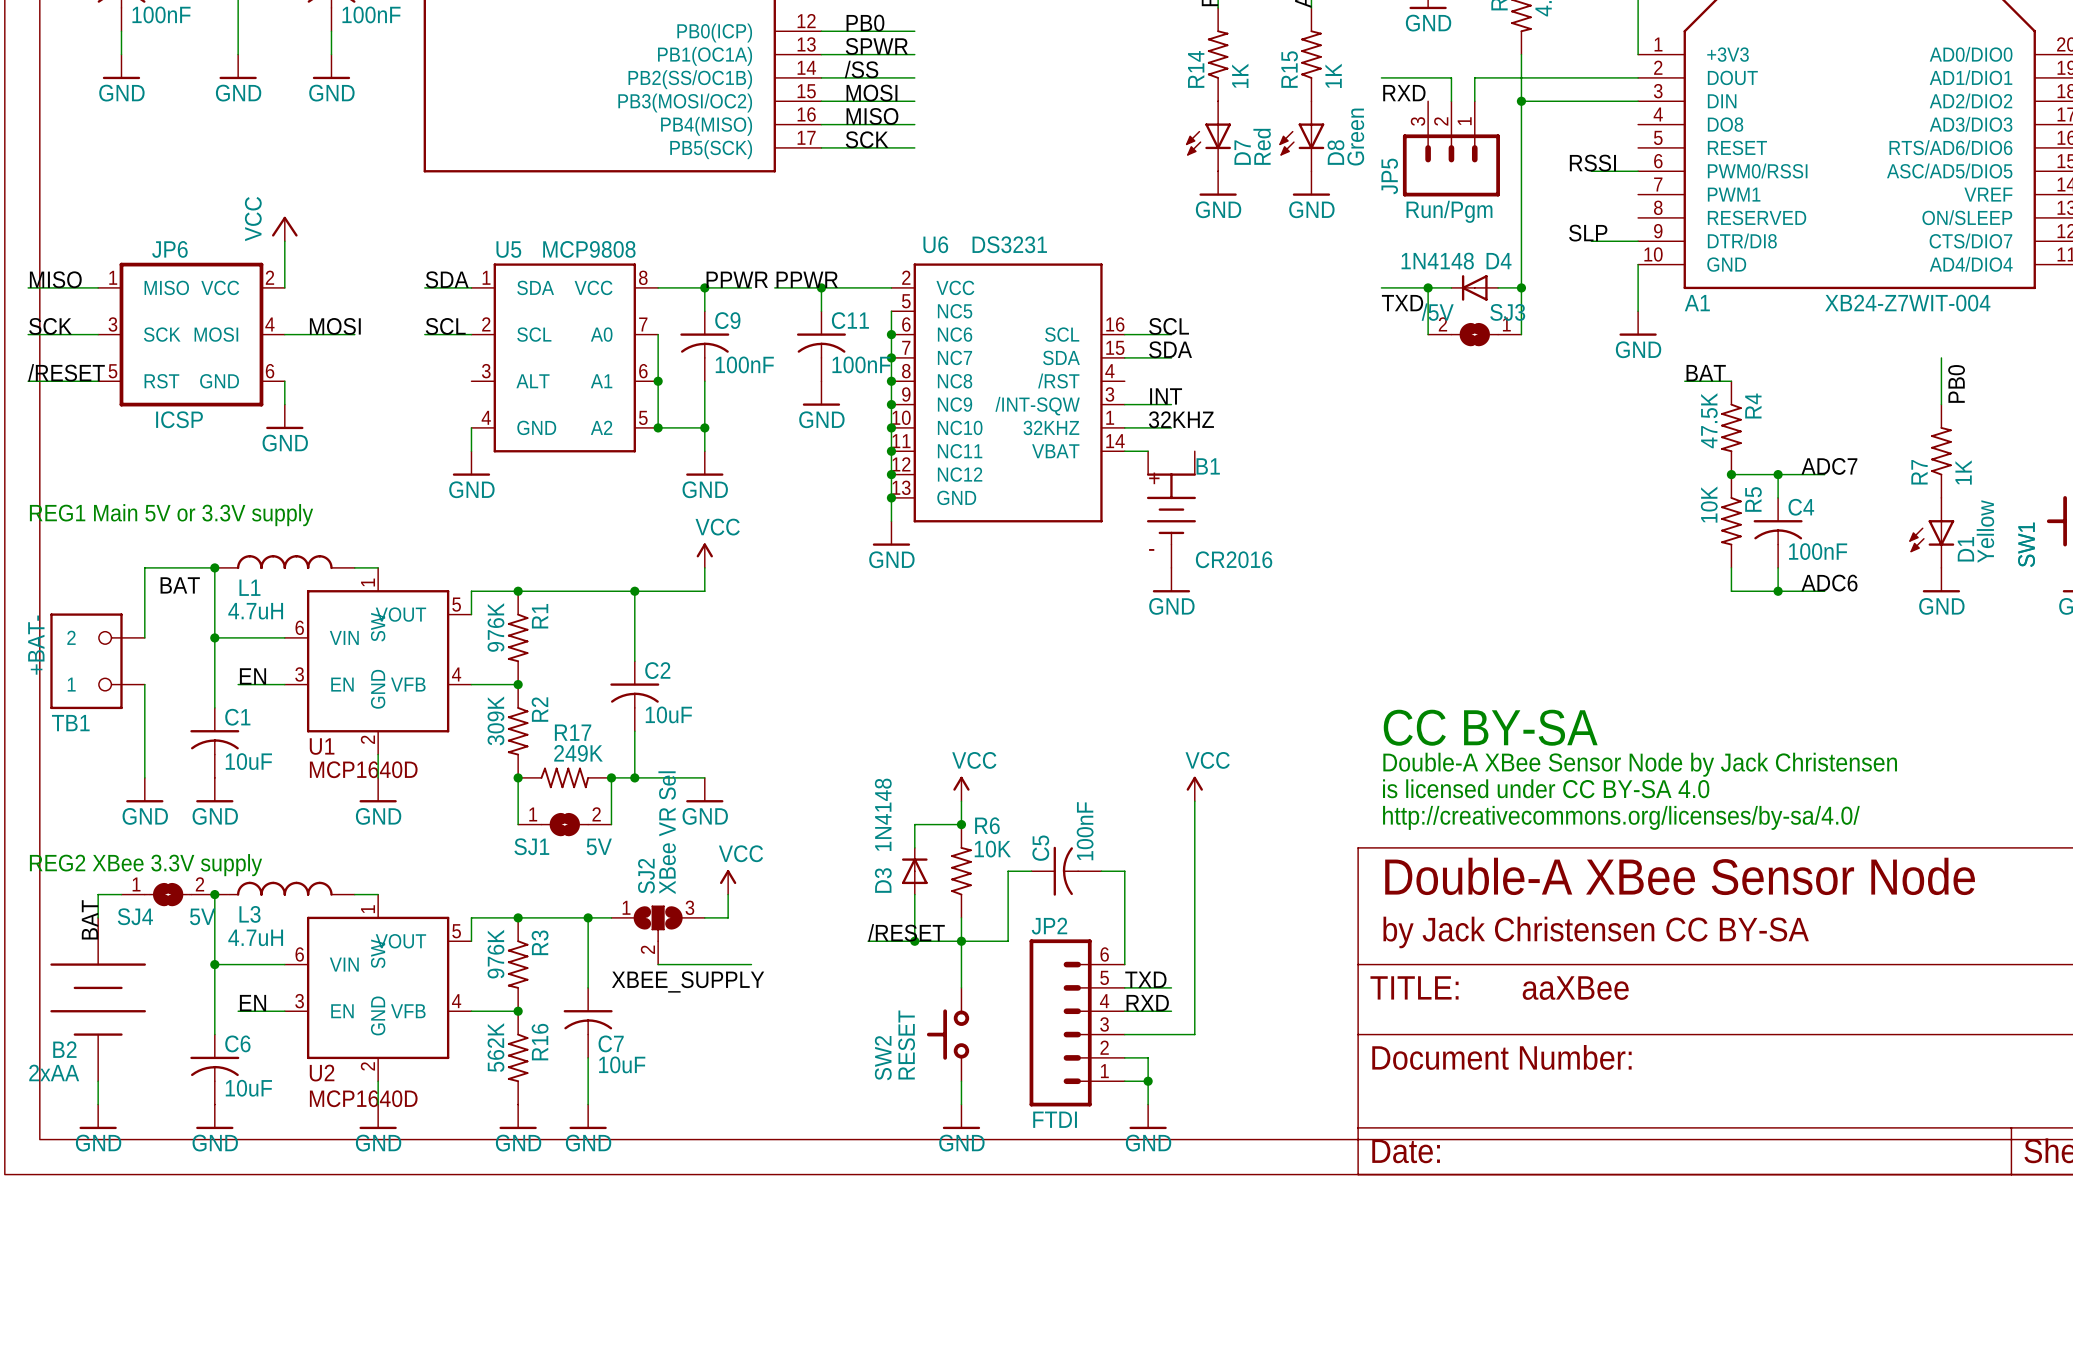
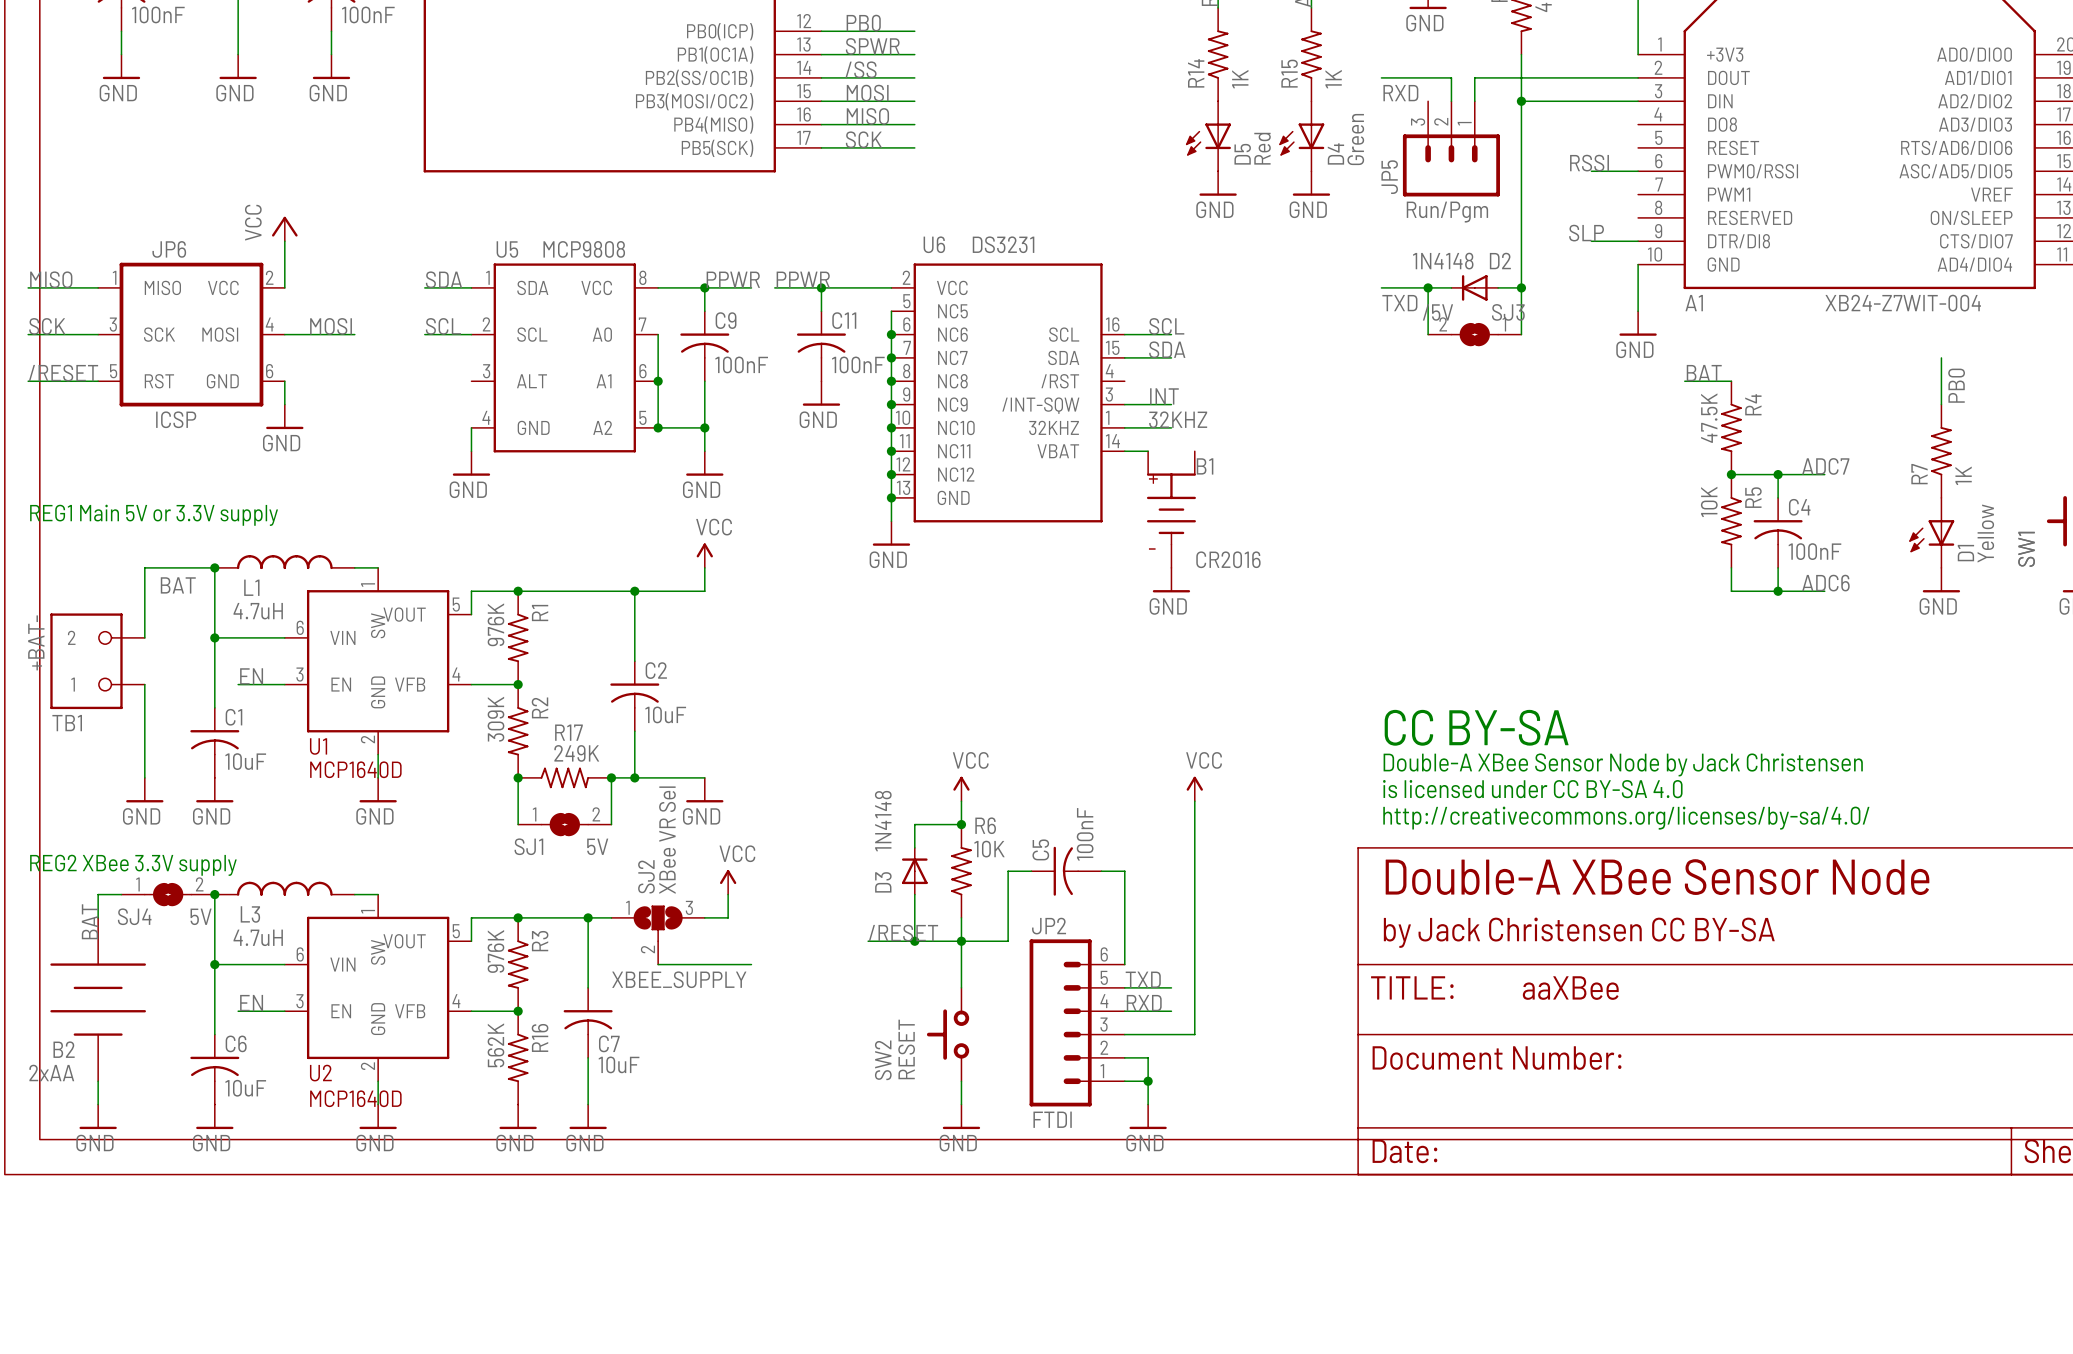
D7 name: D7 (1242, 152) -> D5 (1242, 154)
D8 name: D8 (1335, 152) -> D4 (1335, 153)
D4 name: D4 (1499, 261) -> D2 (1500, 261)

